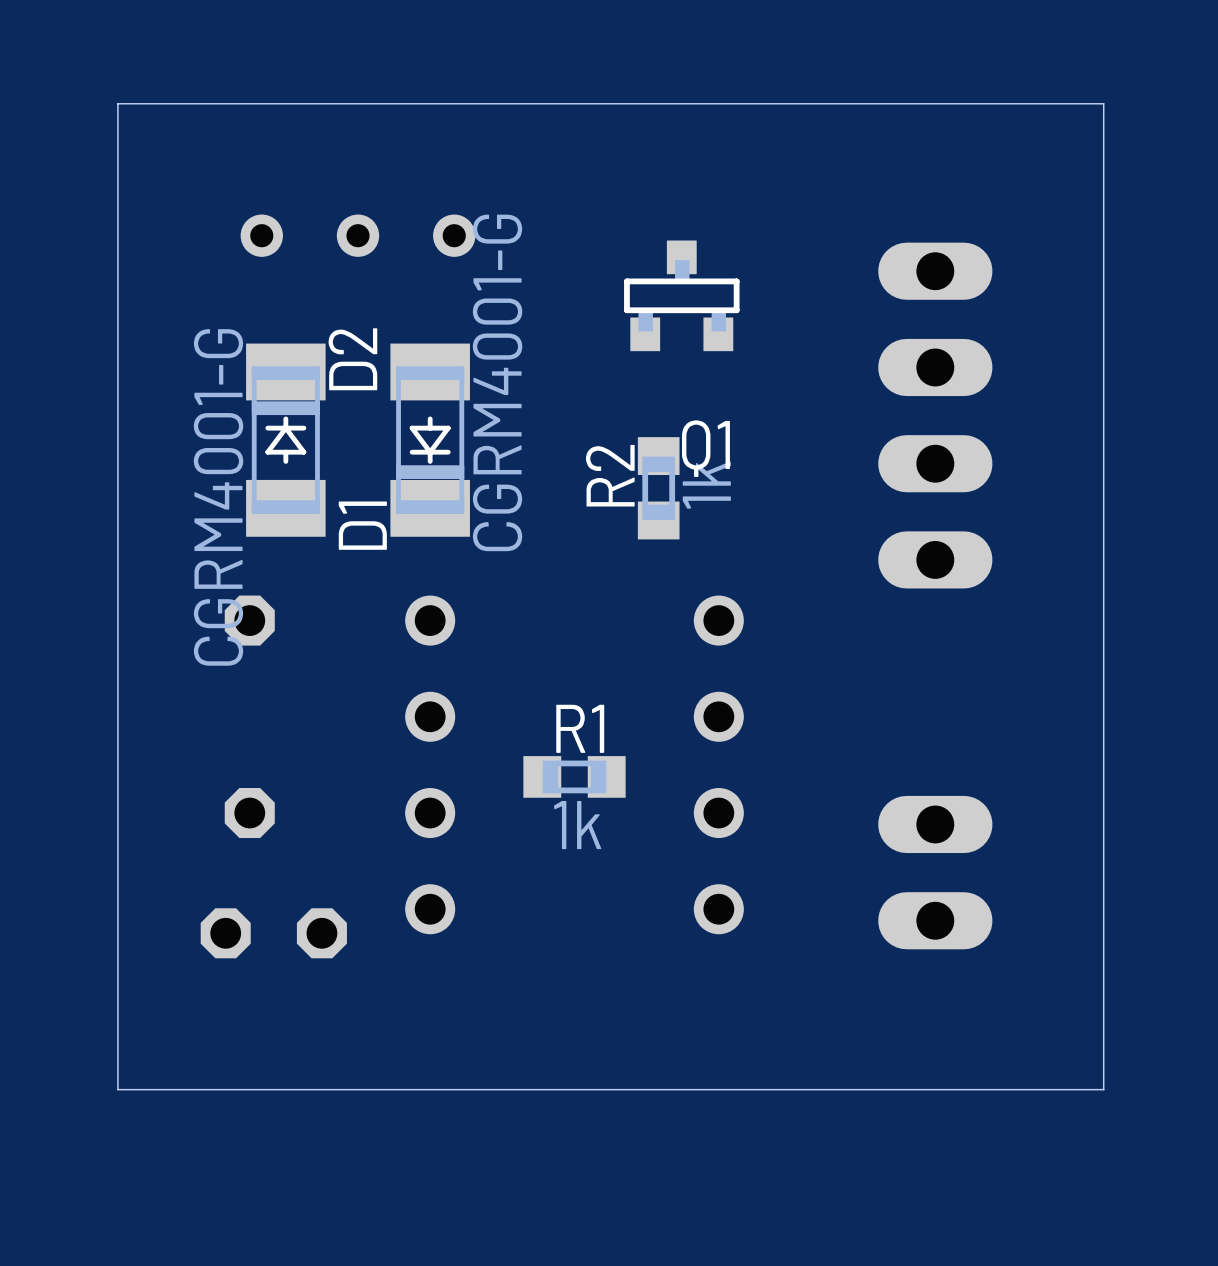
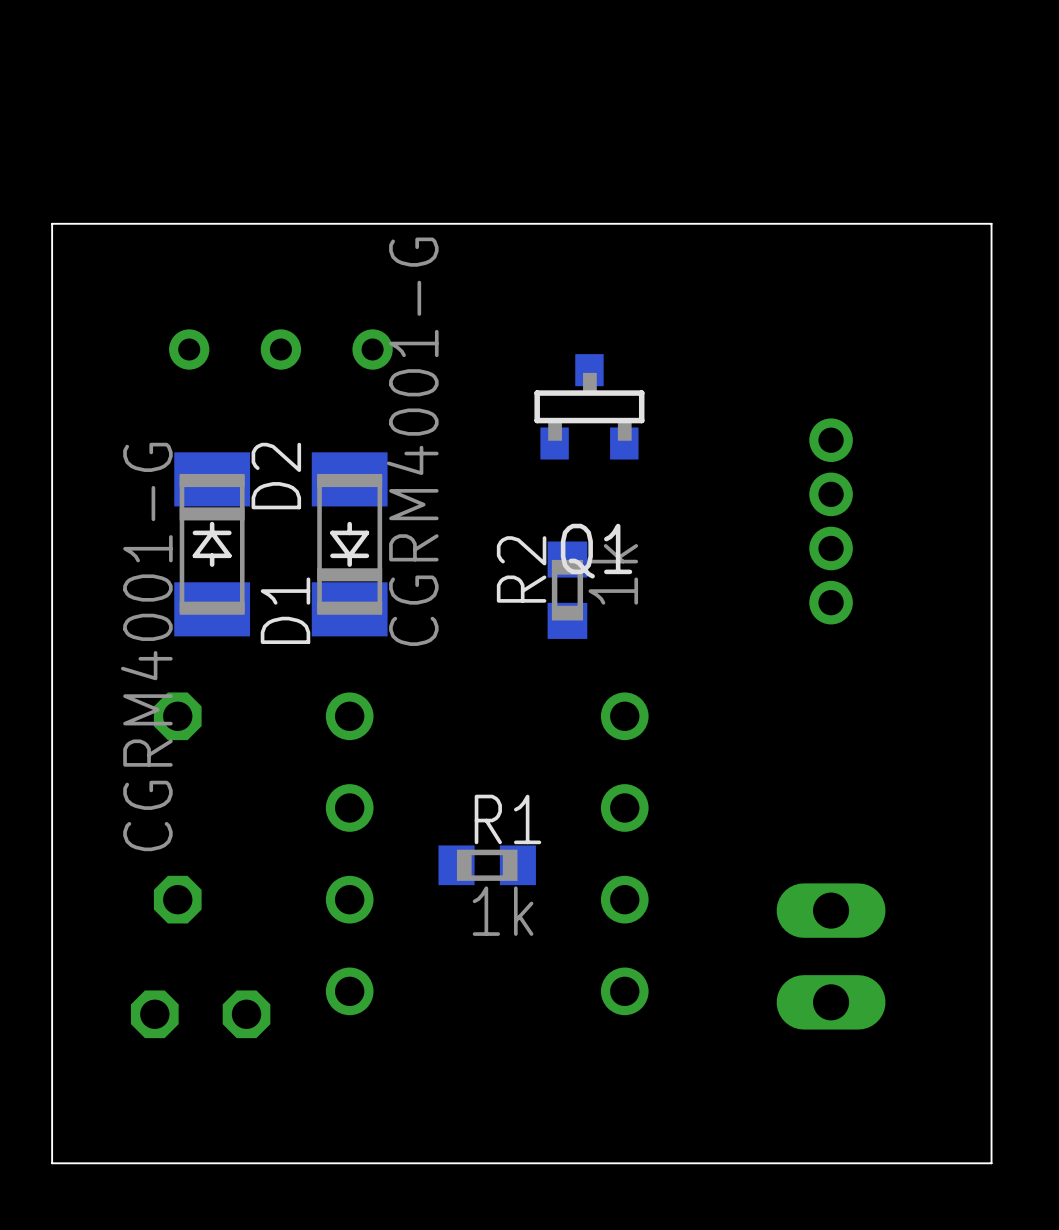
part footprint: [878, 242, 993, 589] -> [809, 418, 853, 625]

